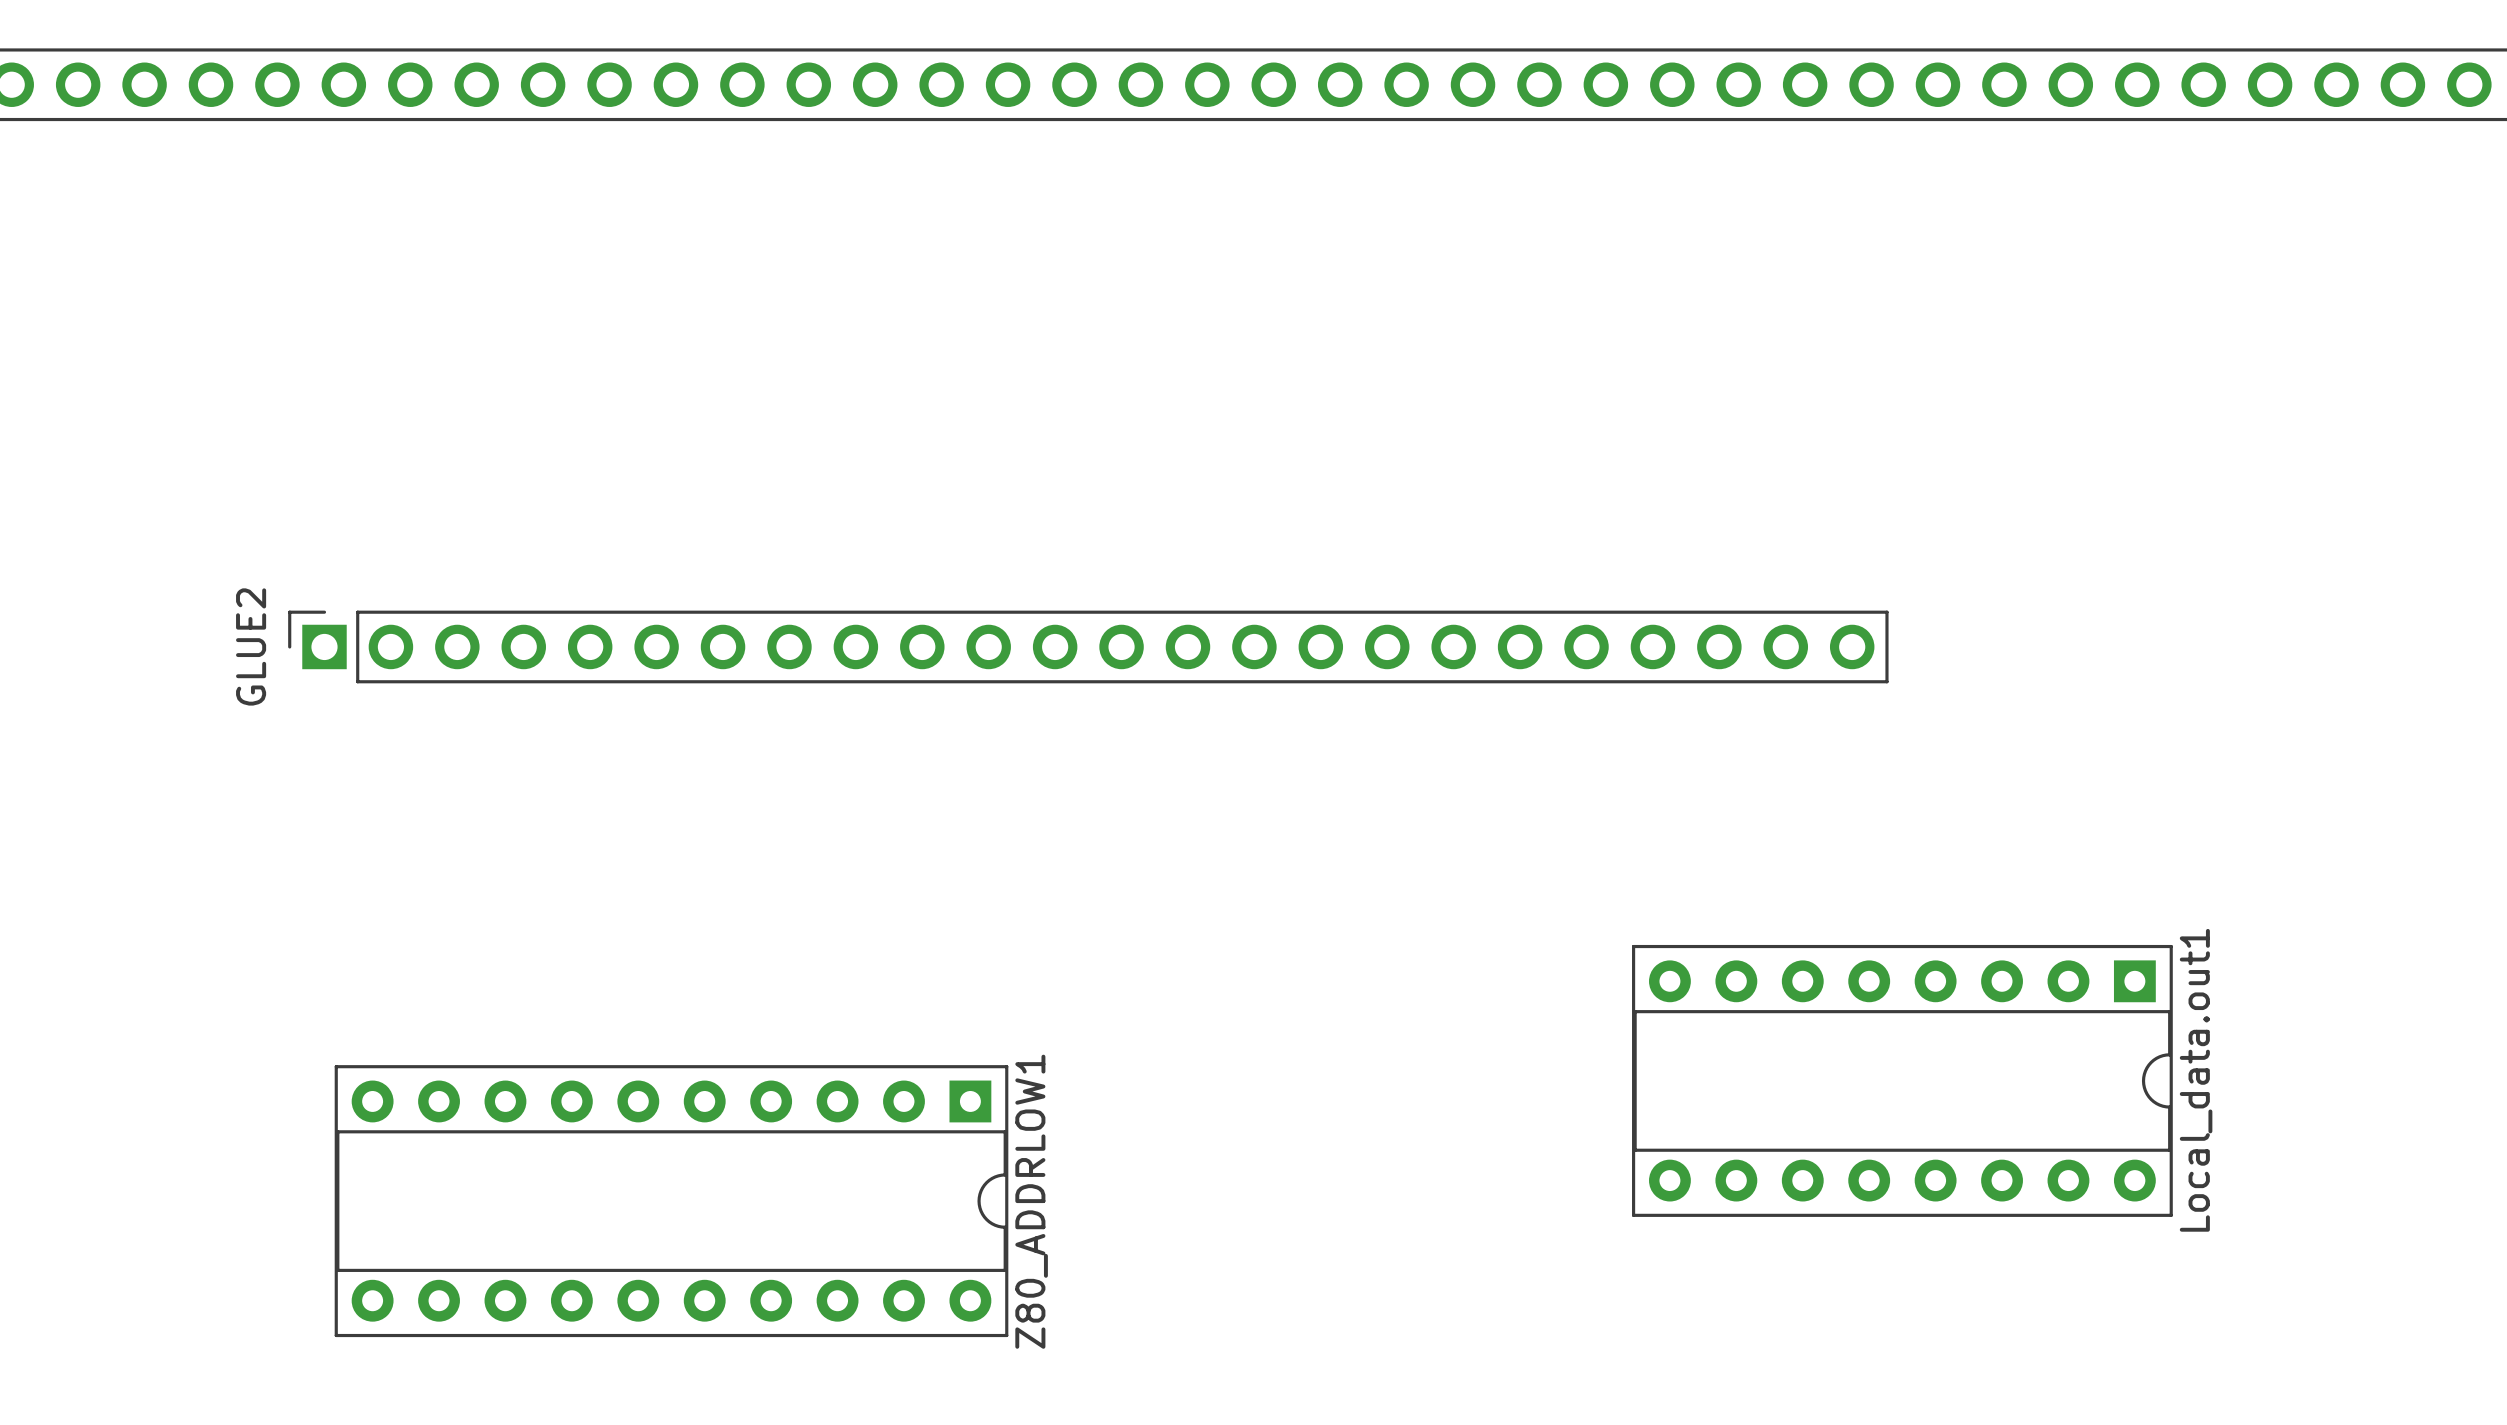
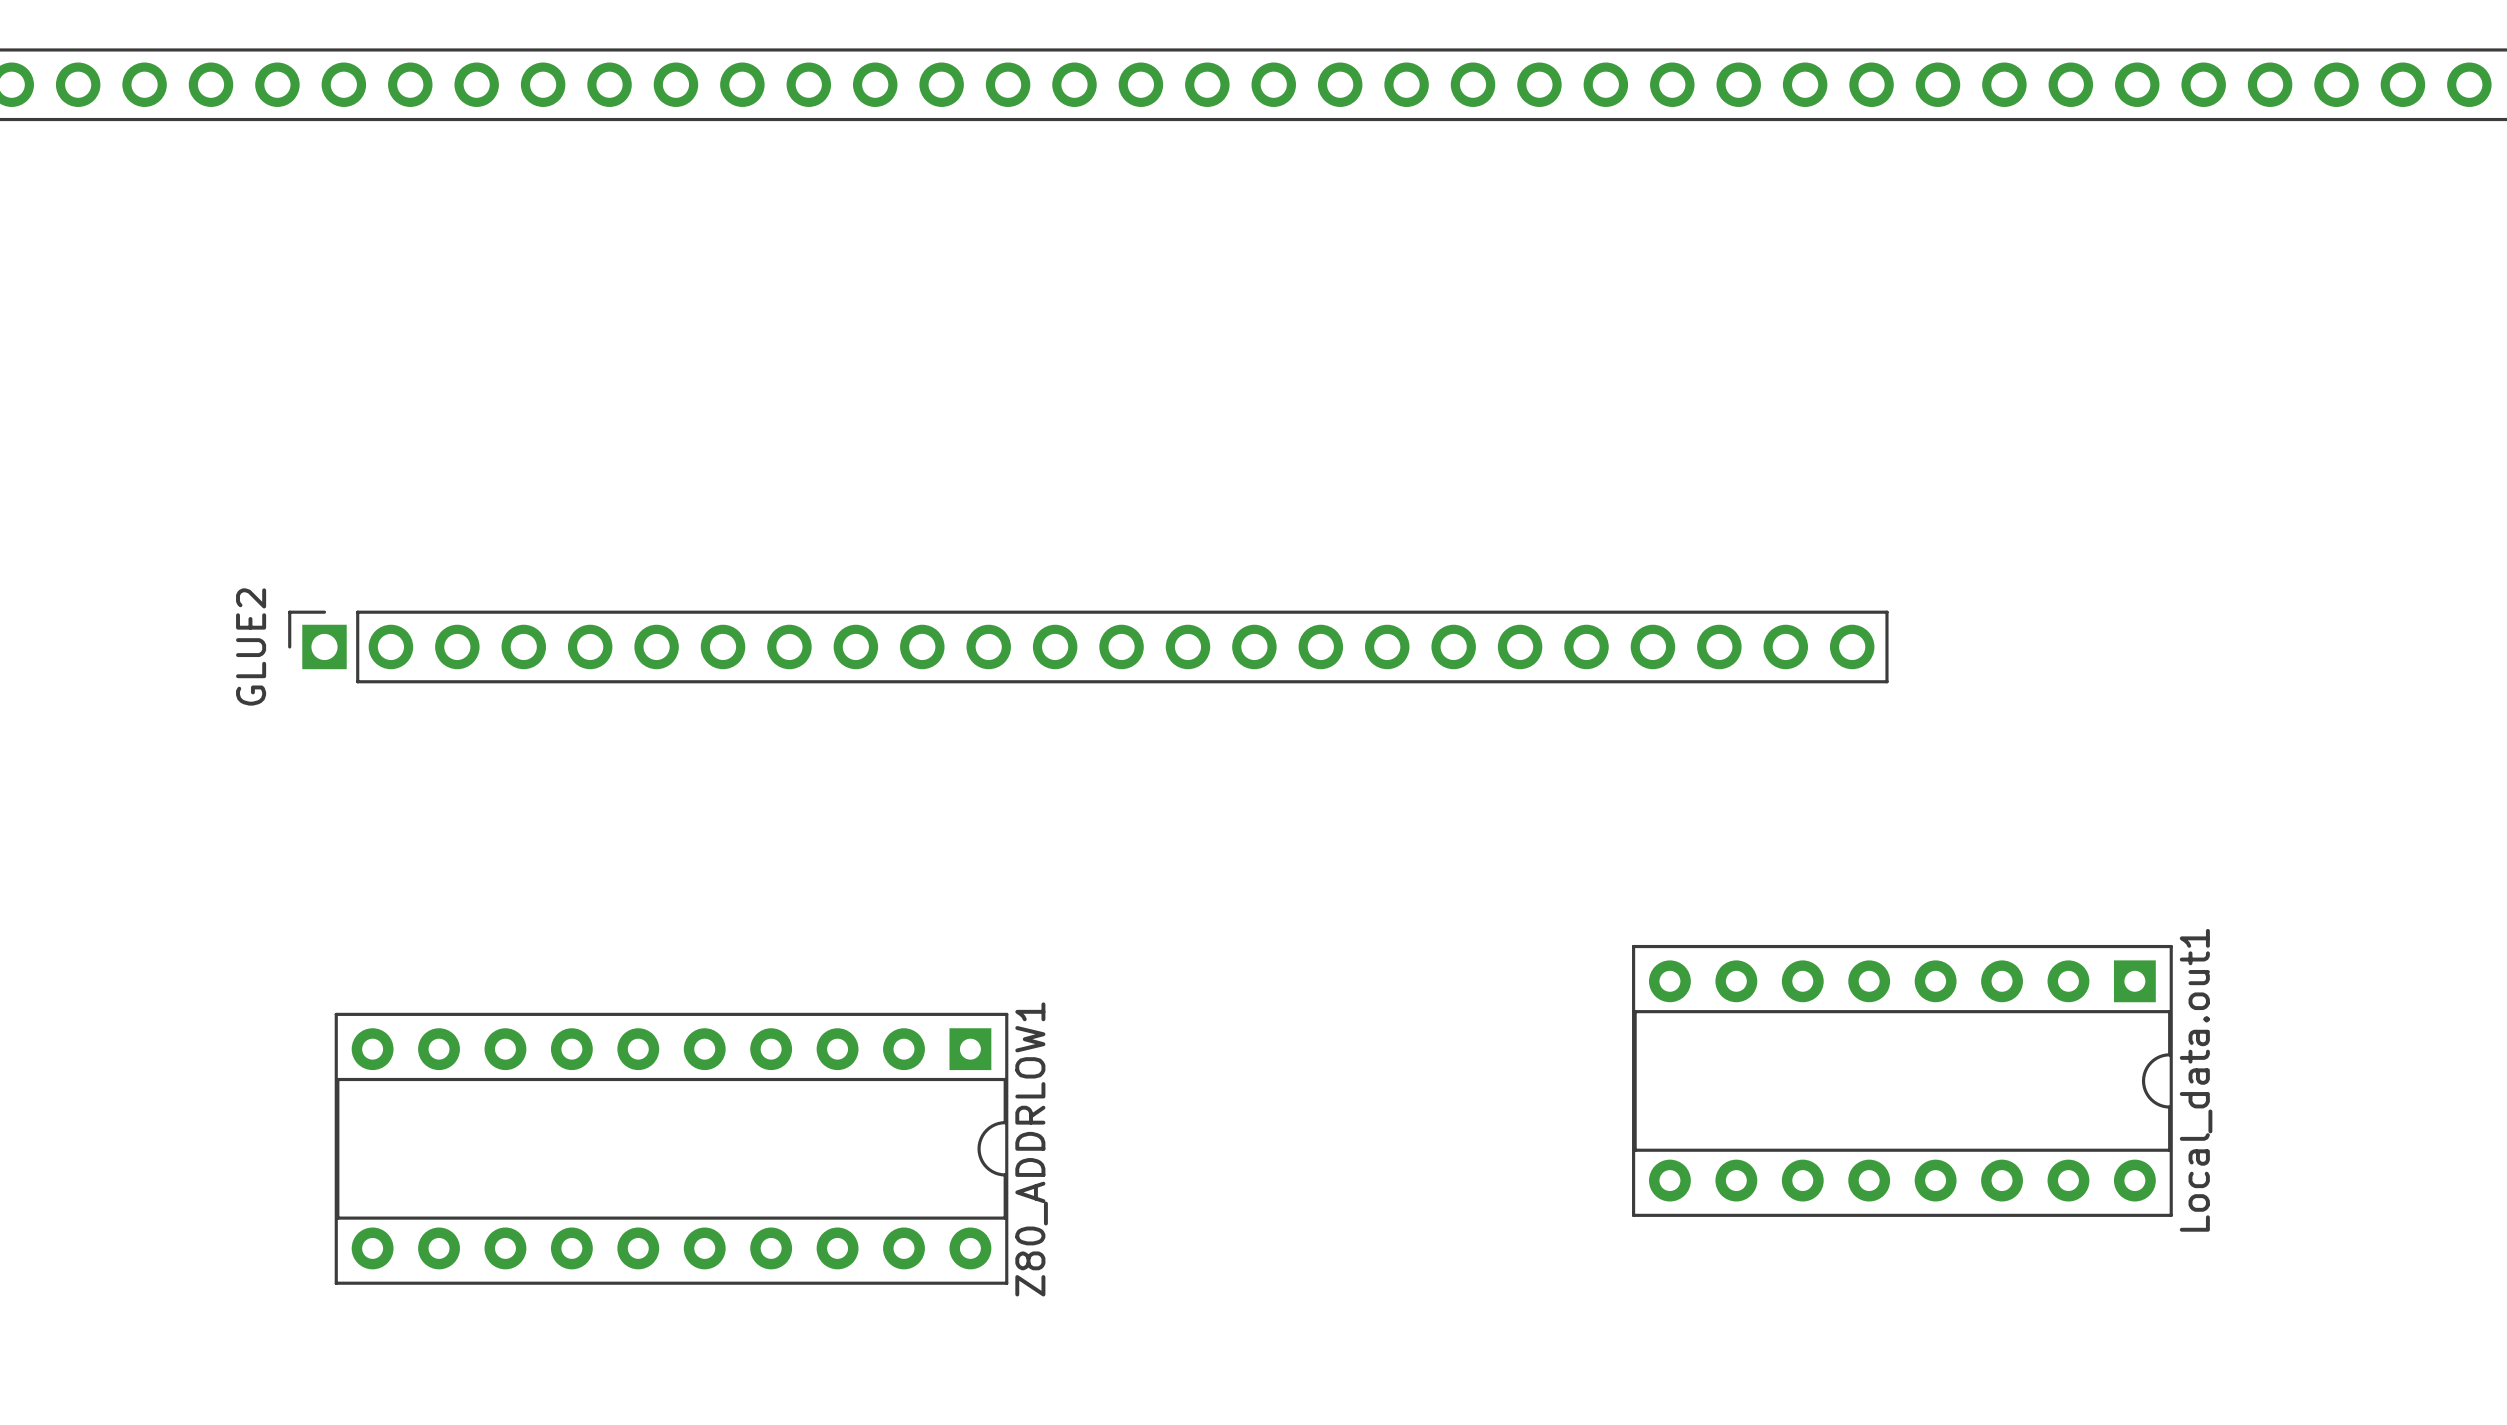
Z80_ADDRLOW1 position: (671, 1201) -> (671, 1148)

